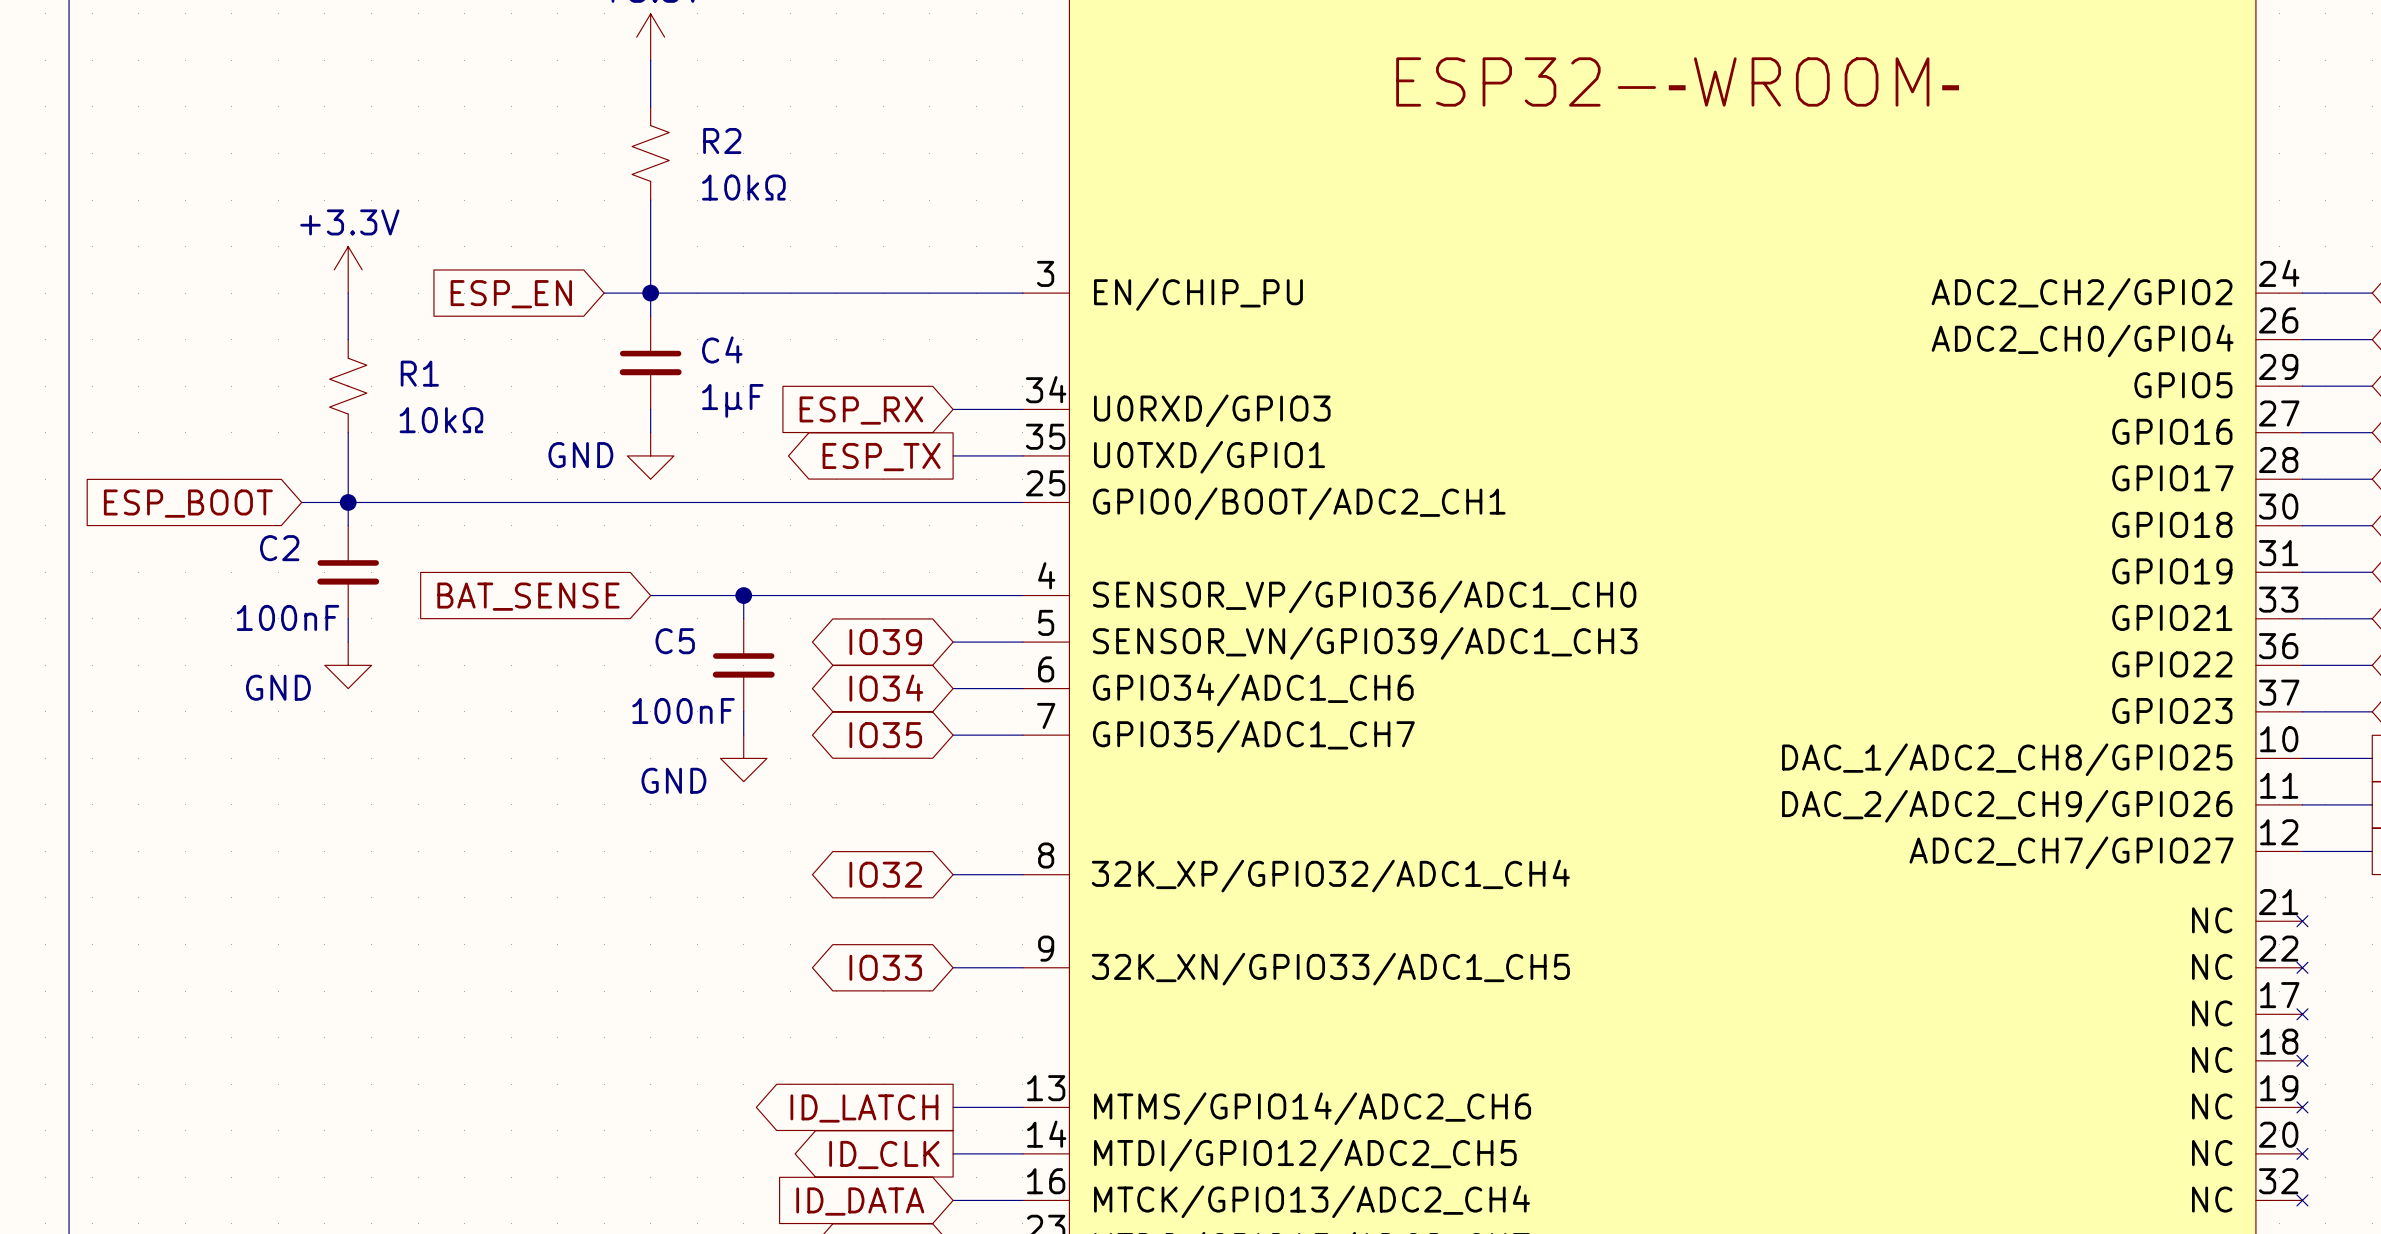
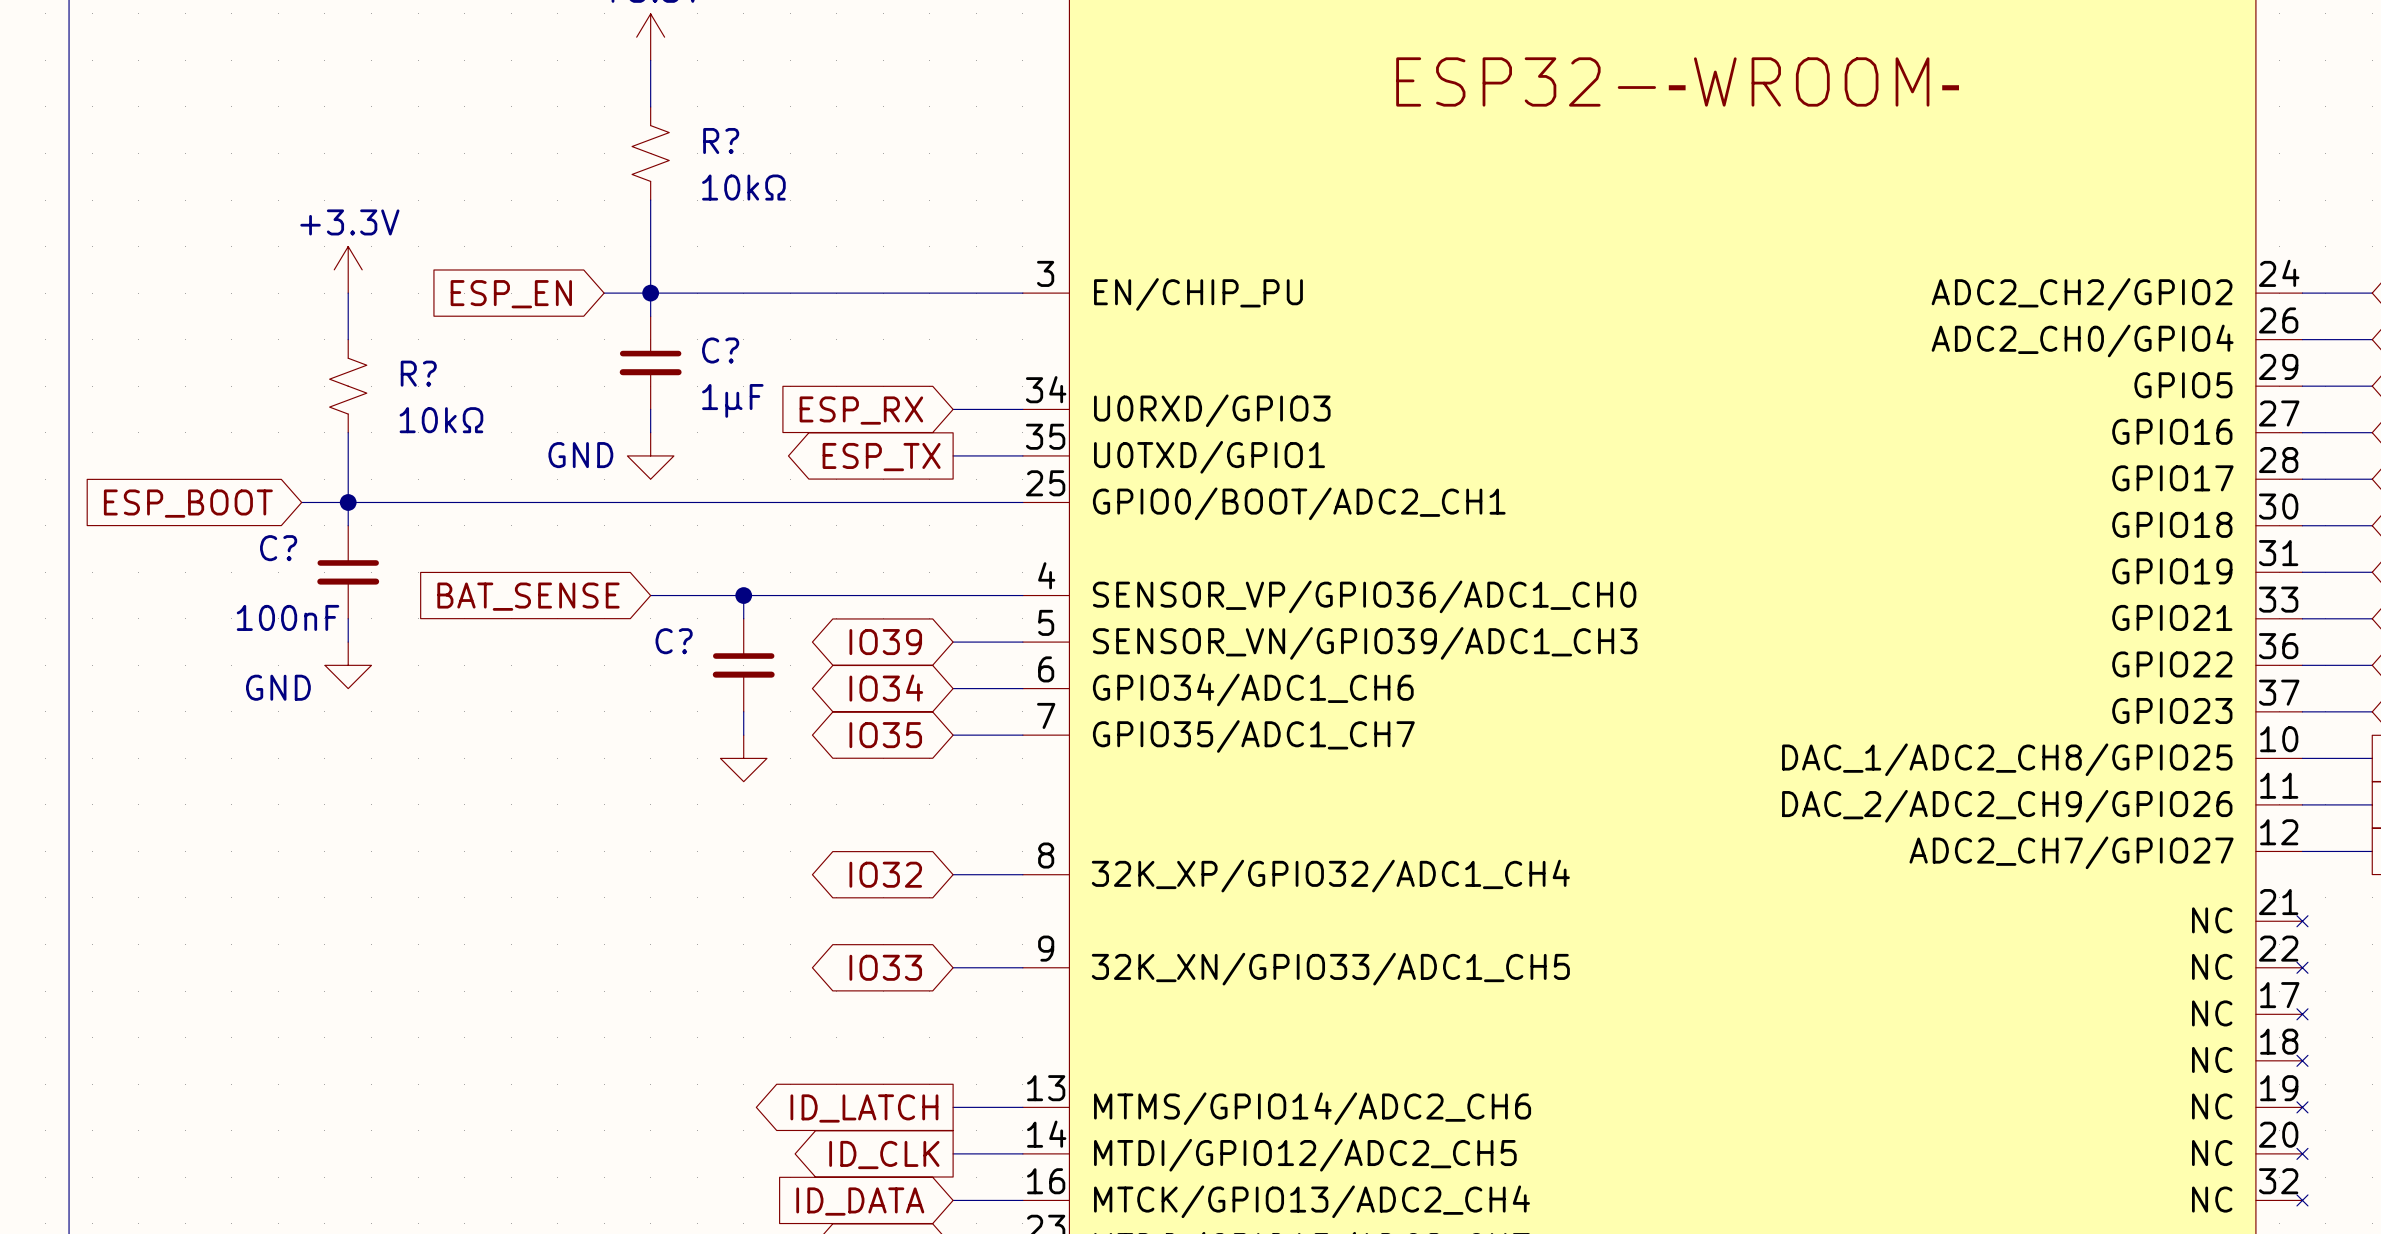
R2 name: R2 (722, 141) -> R? (721, 141)
C4 name: C4 (722, 349) -> C? (720, 350)
R1 name: R1 (419, 373) -> R? (418, 373)
C2 name: C2 (279, 548) -> C? (278, 548)
C5 name: C5 (675, 641) -> C? (674, 641)
C5 value: 100nF (683, 710) -> none
power symbol text: GND (673, 780) -> none

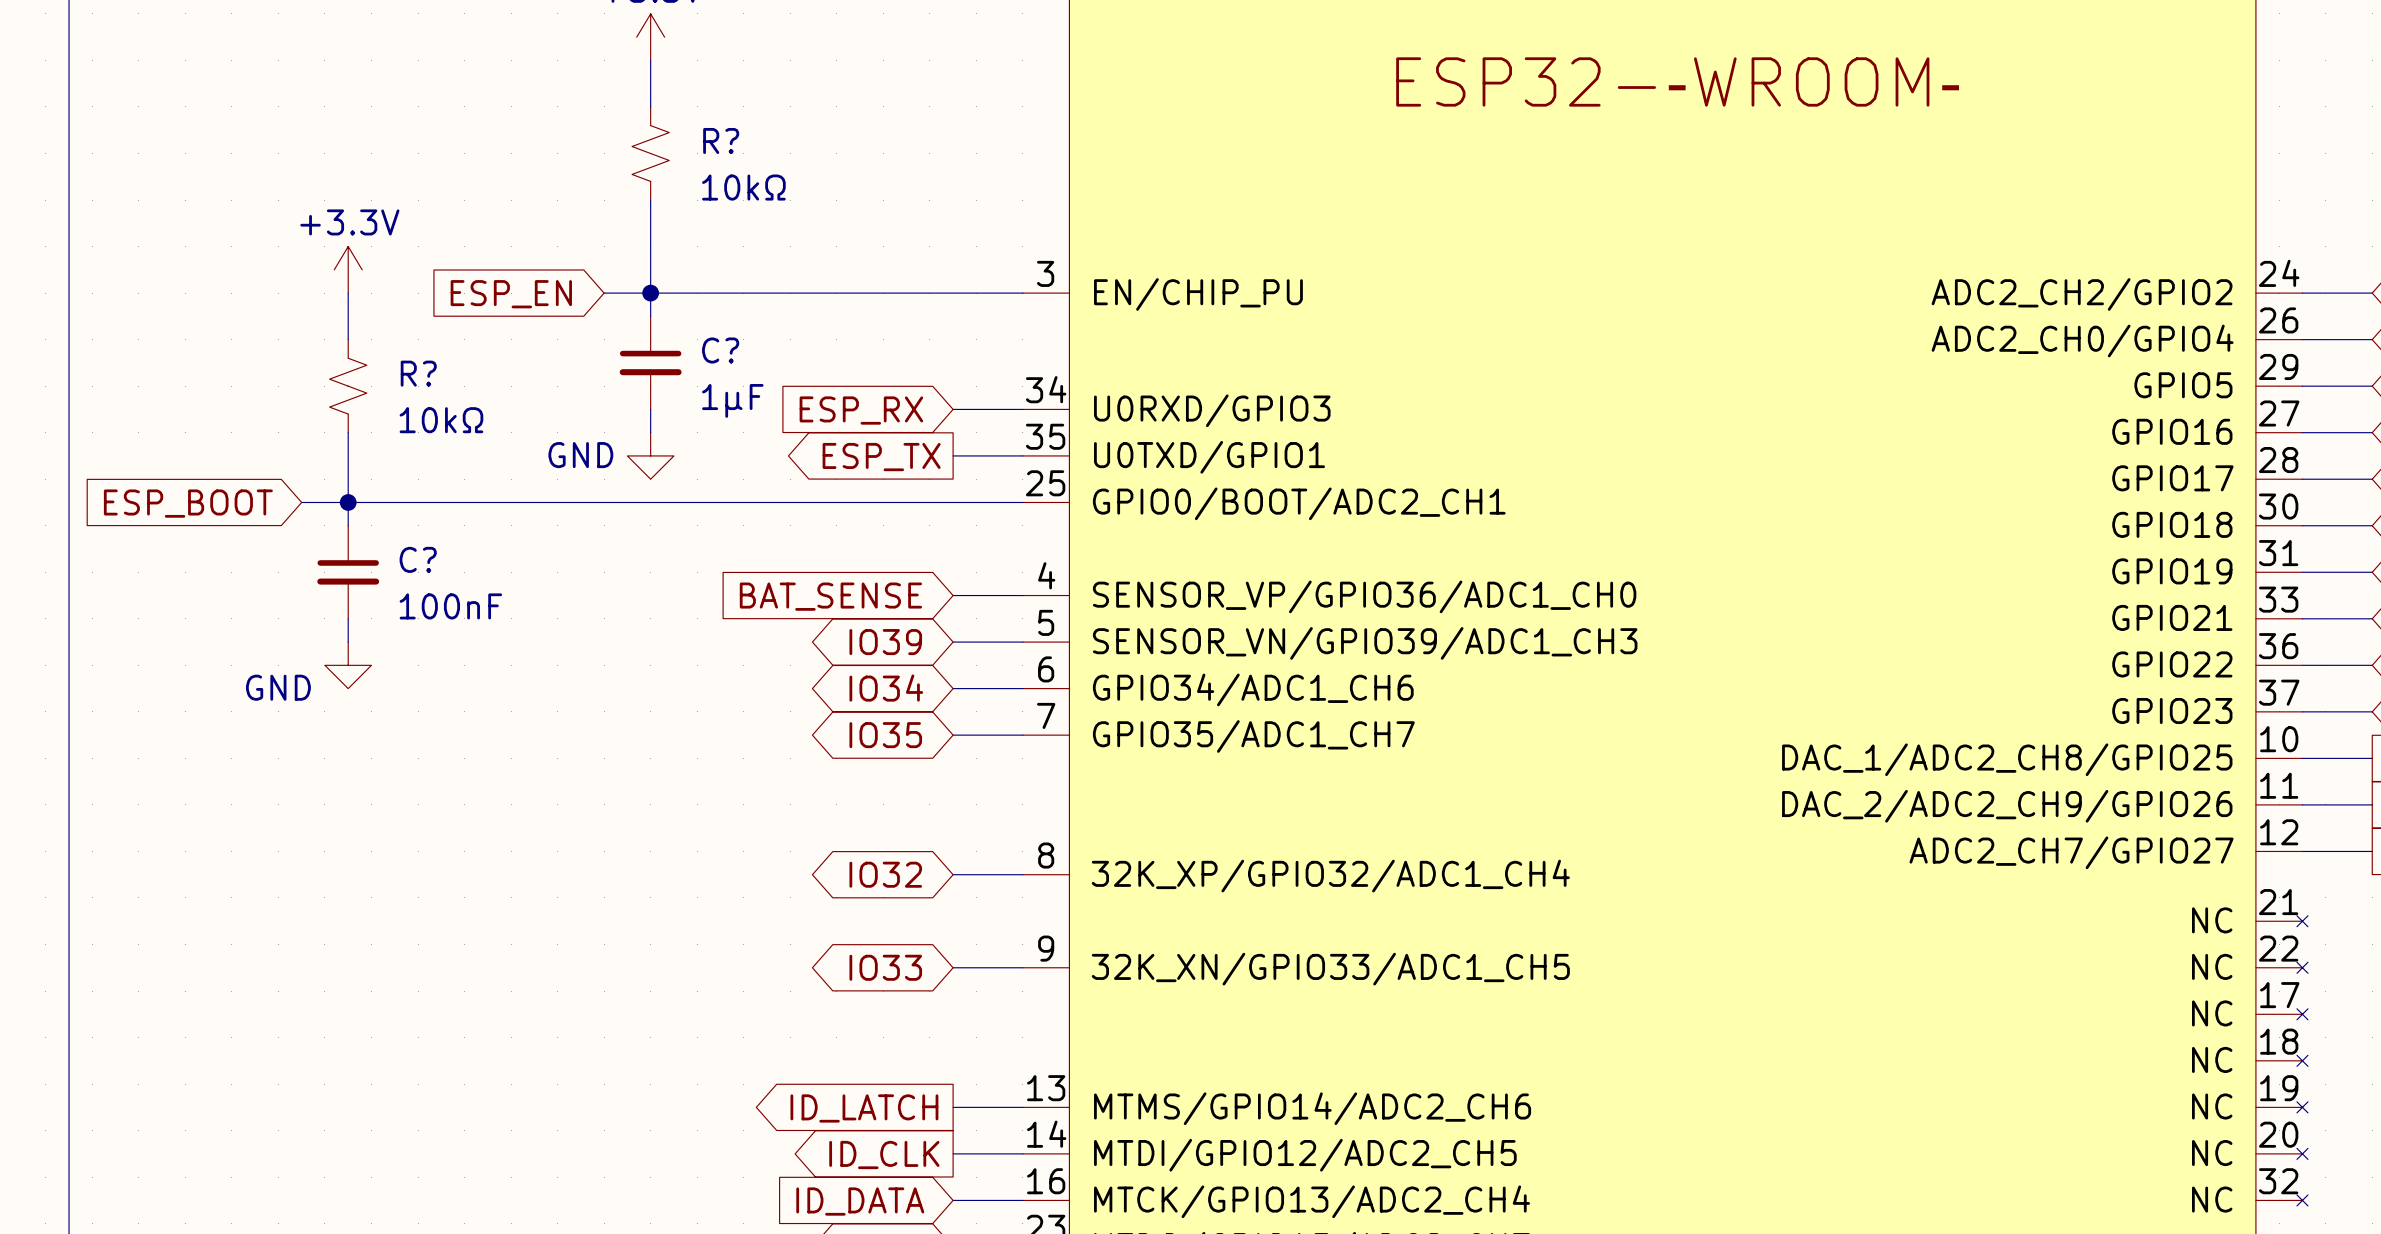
C? name position: C? (278, 548) -> C? (418, 559)
wire: (650, 595) (953, 595) -> none
wire: (743, 595) (743, 618) -> none
junction: (743, 595) -> none
global label position: BAT_SENSE (528, 596) -> BAT_SENSE (830, 596)
C? value position: 100nF (288, 617) -> 100nF (450, 606)
C?: (743, 665) -> none
wire: (743, 711) (743, 735) -> none
power symbol: (743, 758) -> none

